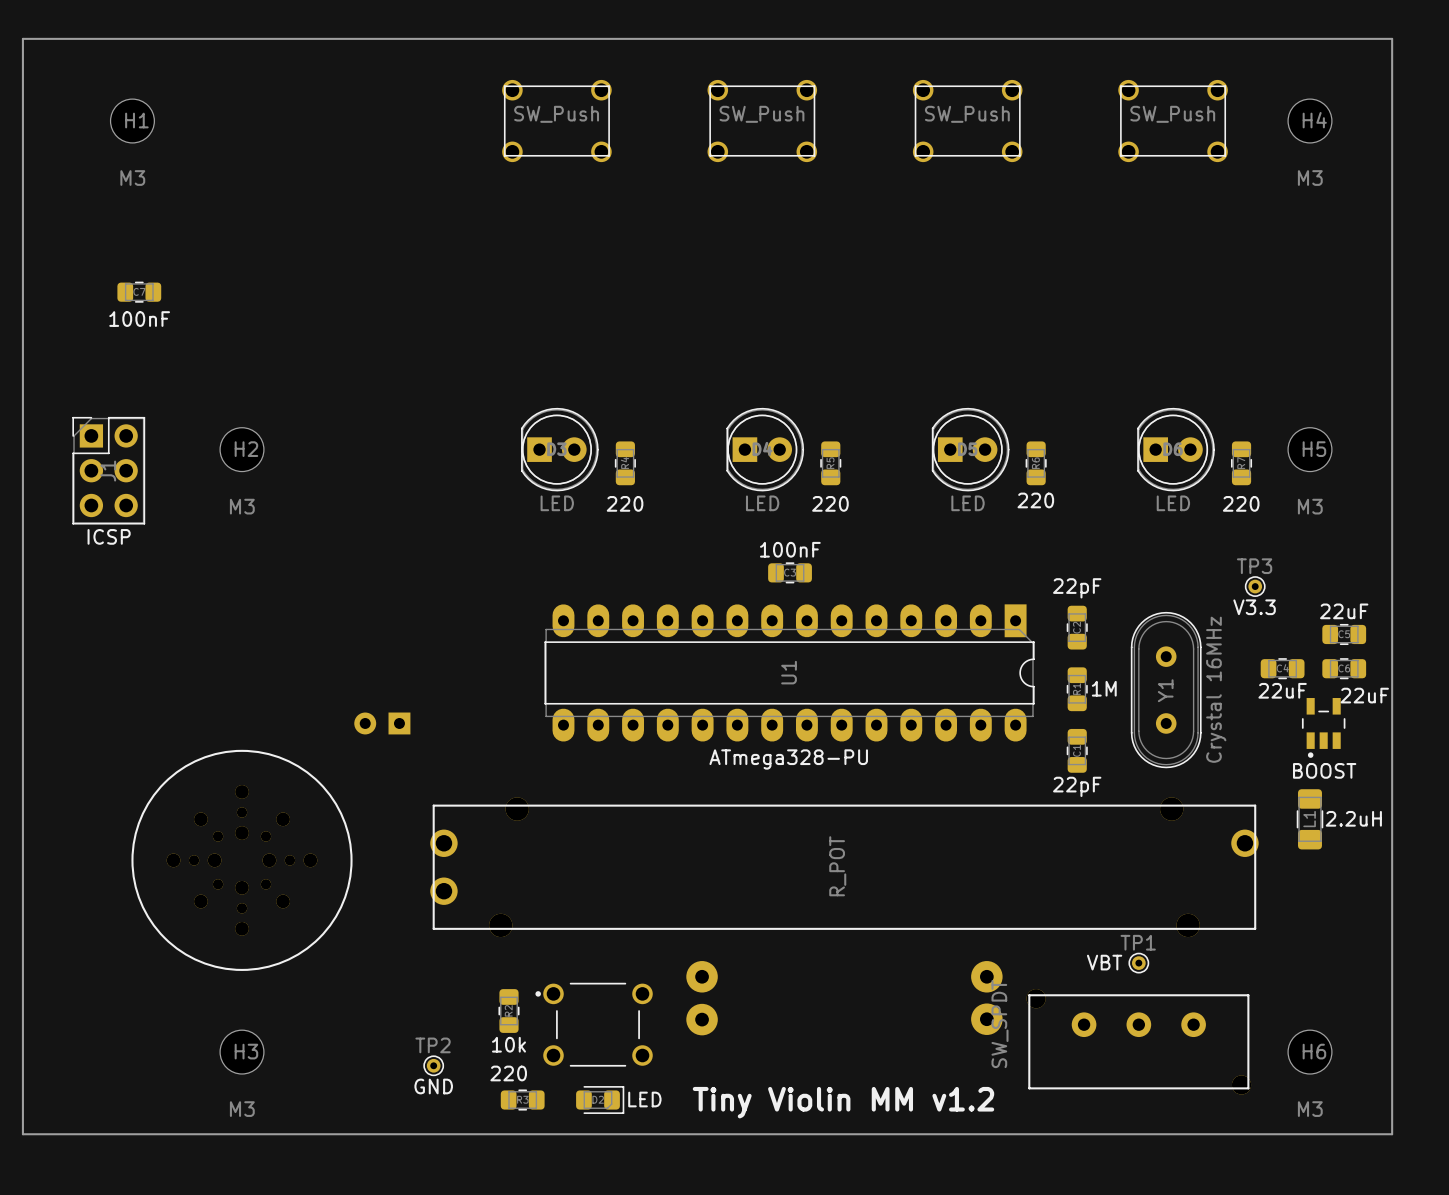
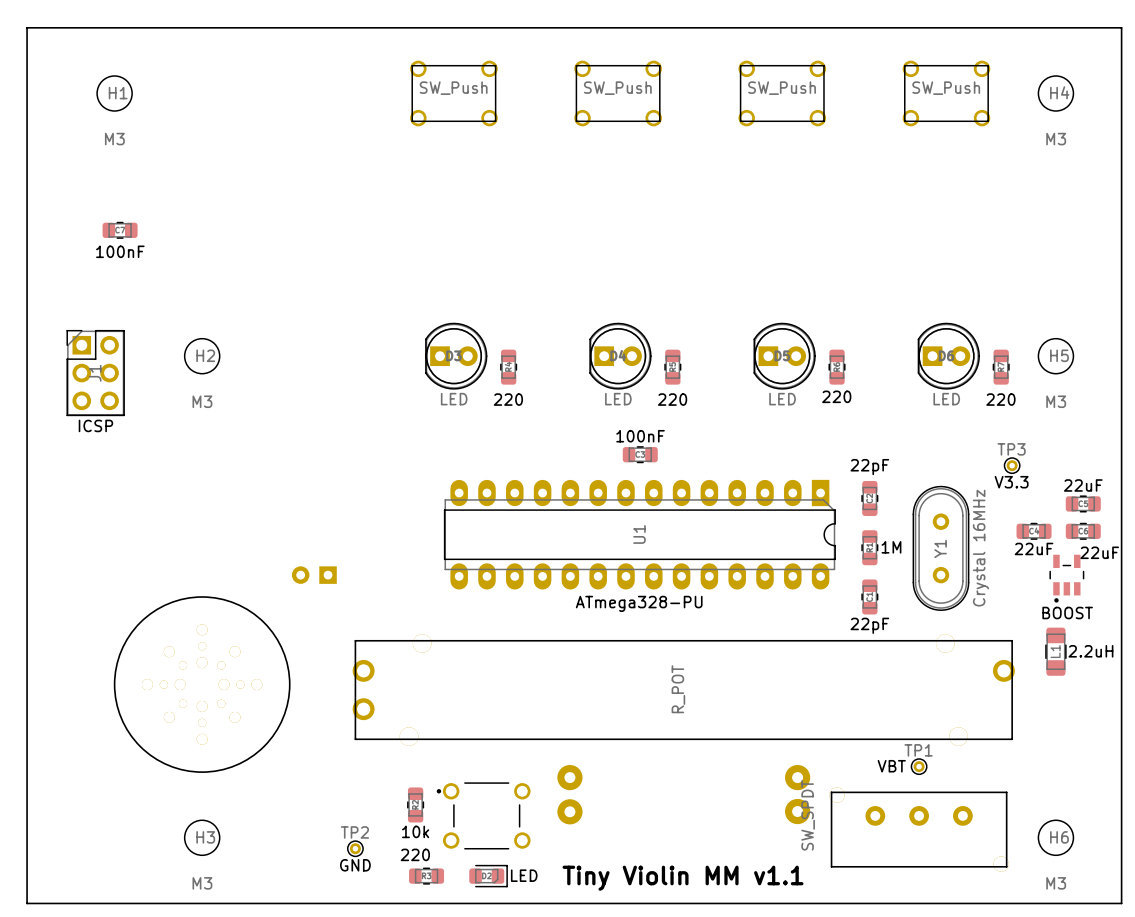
text: Tiny Violin MM v1.2 (843, 1102) -> Tiny Violin MM v1.1 (682, 878)

